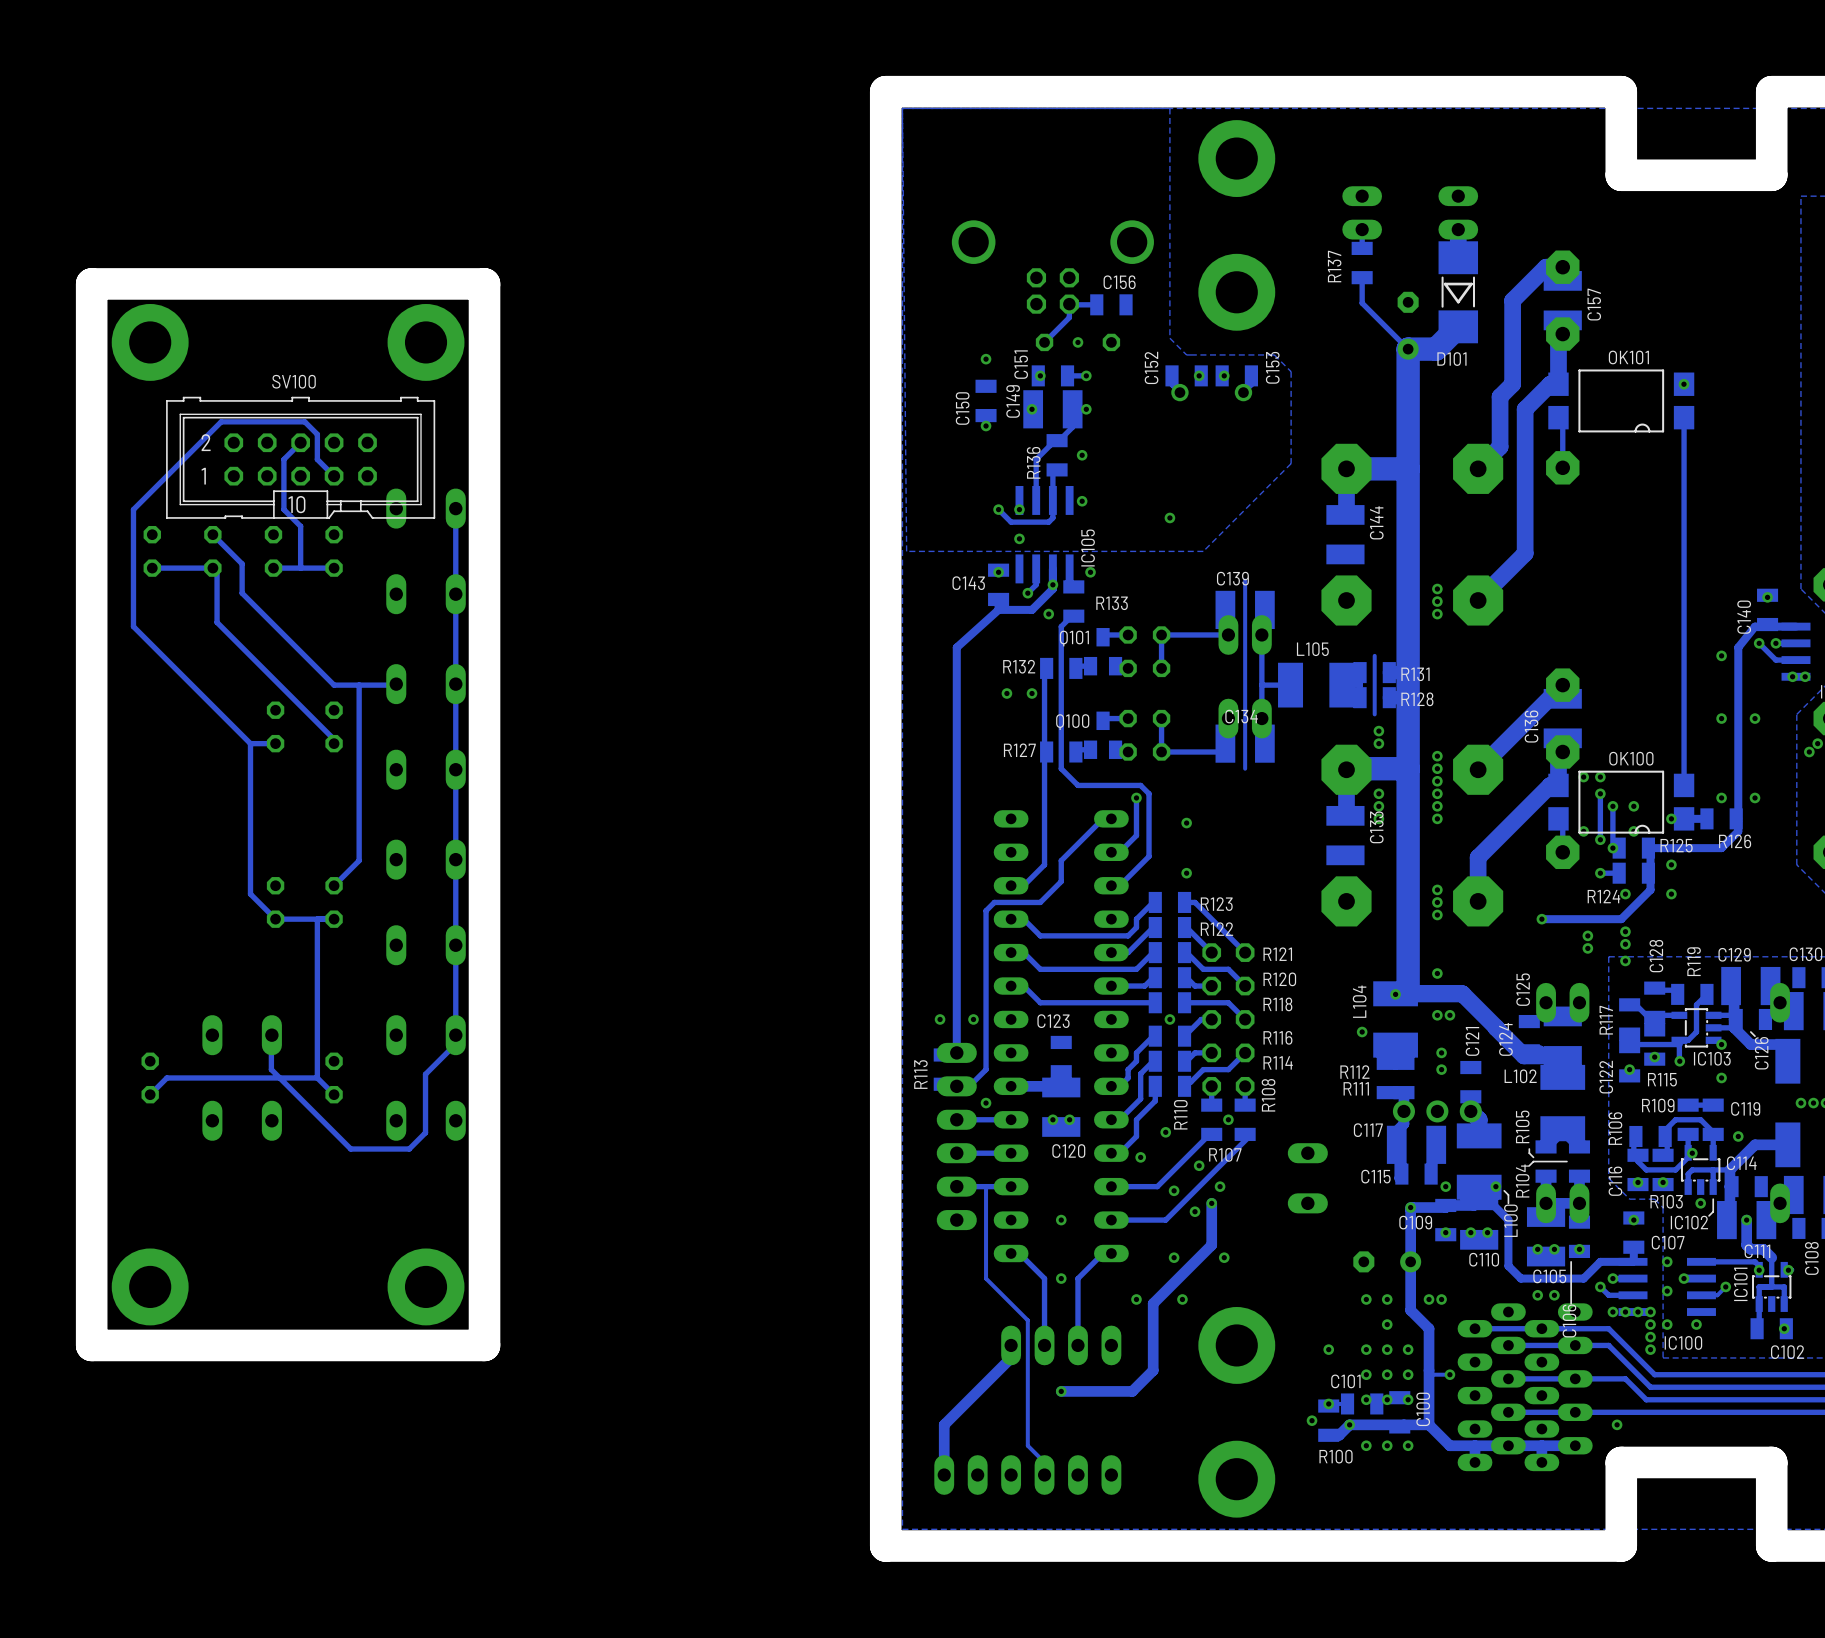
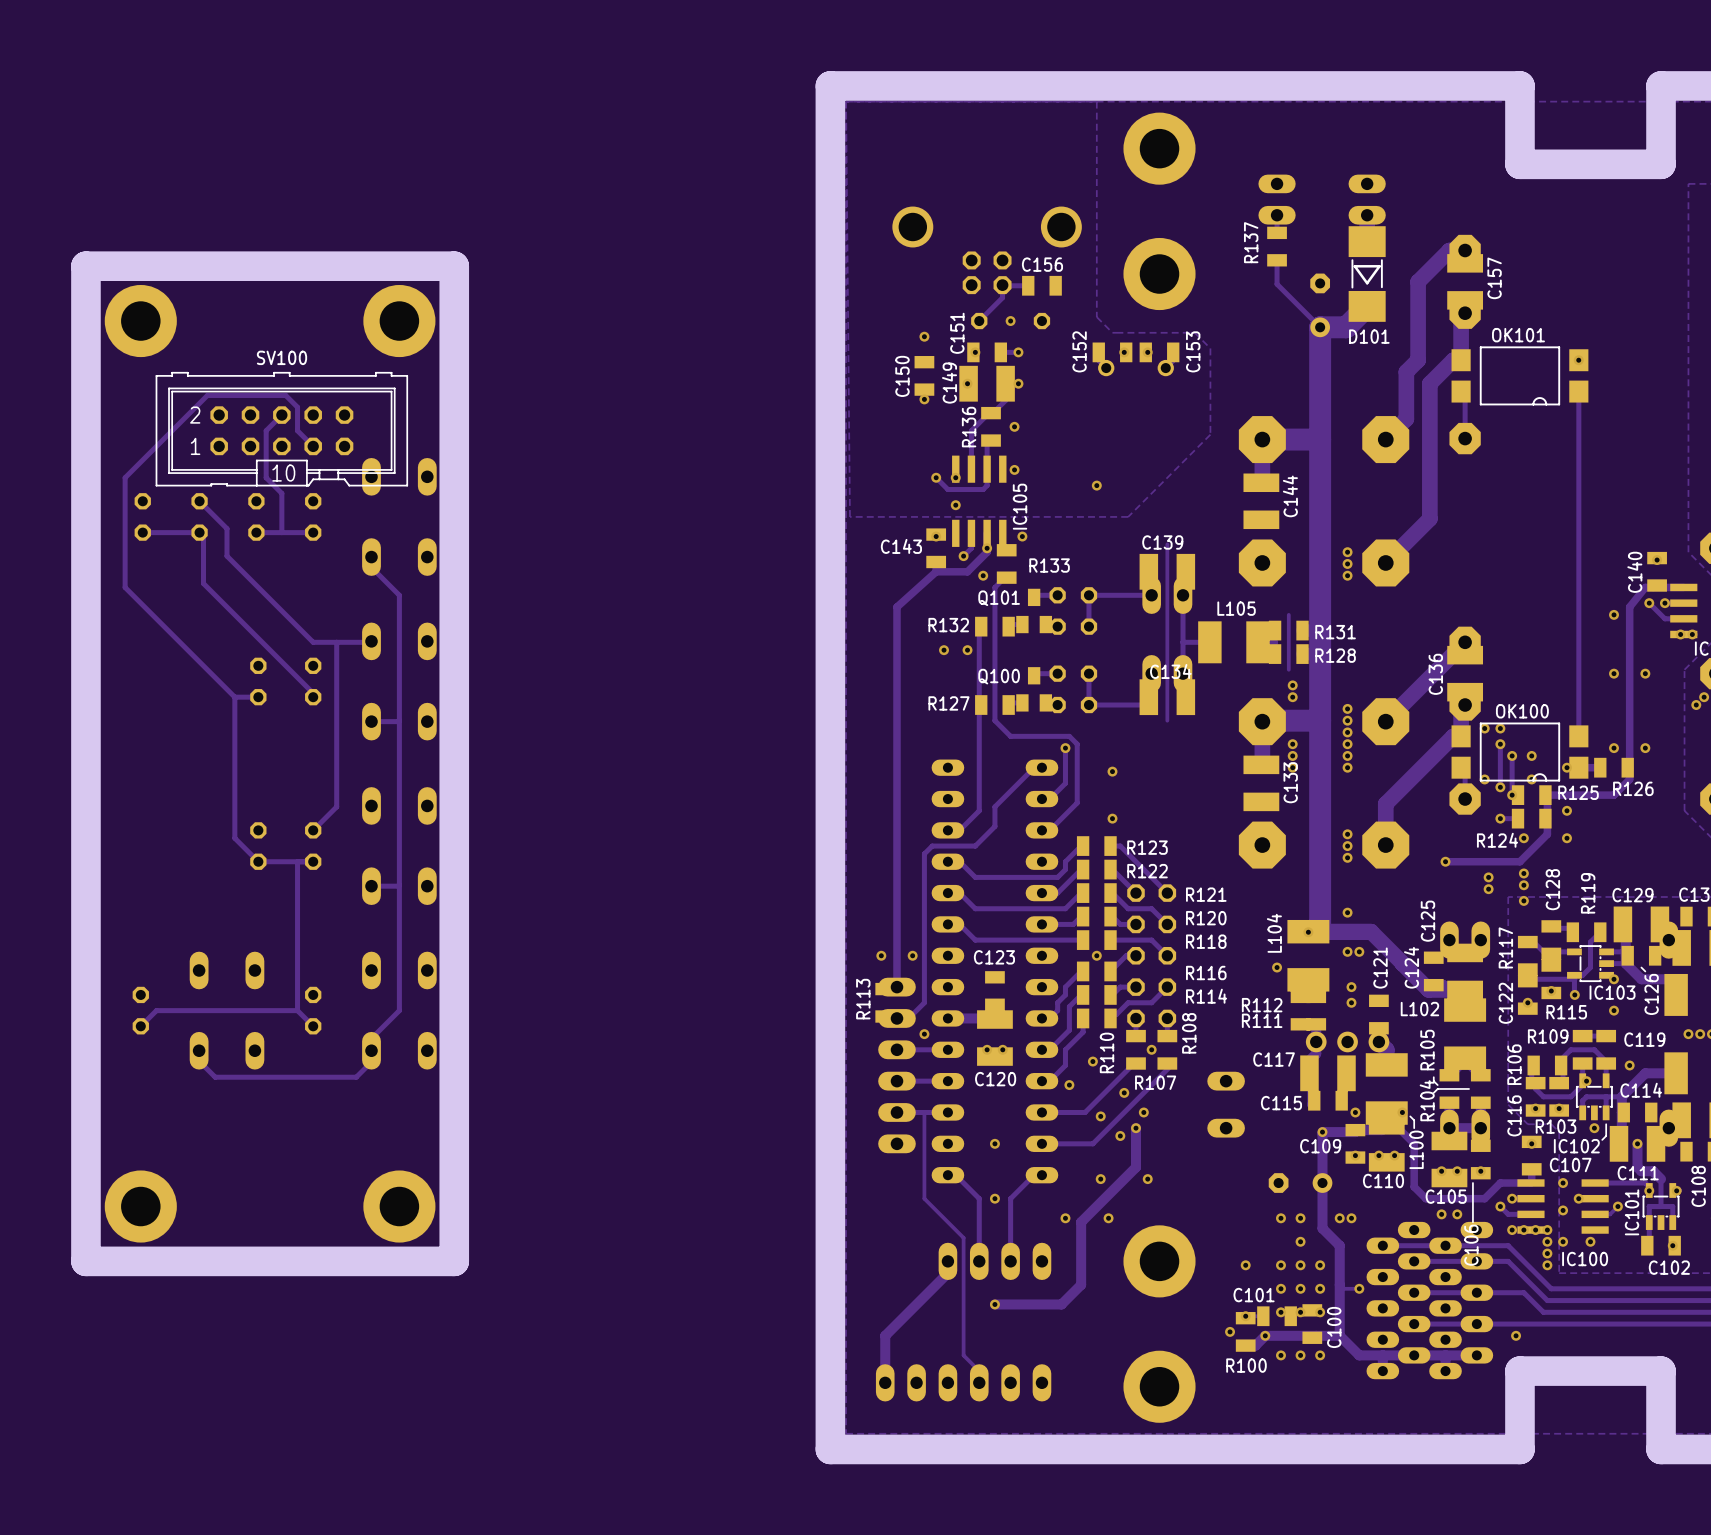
track: (455, 508) (455, 1044) (425, 1074) (425, 1132) (409, 1149) (380, 1149) -> (371, 557) (371, 567) (399, 595) (399, 1010) (372, 1037) (371, 1062) (356, 1077)
track: none -> (399, 720) (371, 721)
track: none -> (399, 885) (371, 886)
track: (271, 1035) (271, 1069) (350, 1149) -> (199, 1050) (199, 1061) (215, 1077) (328, 1077)

